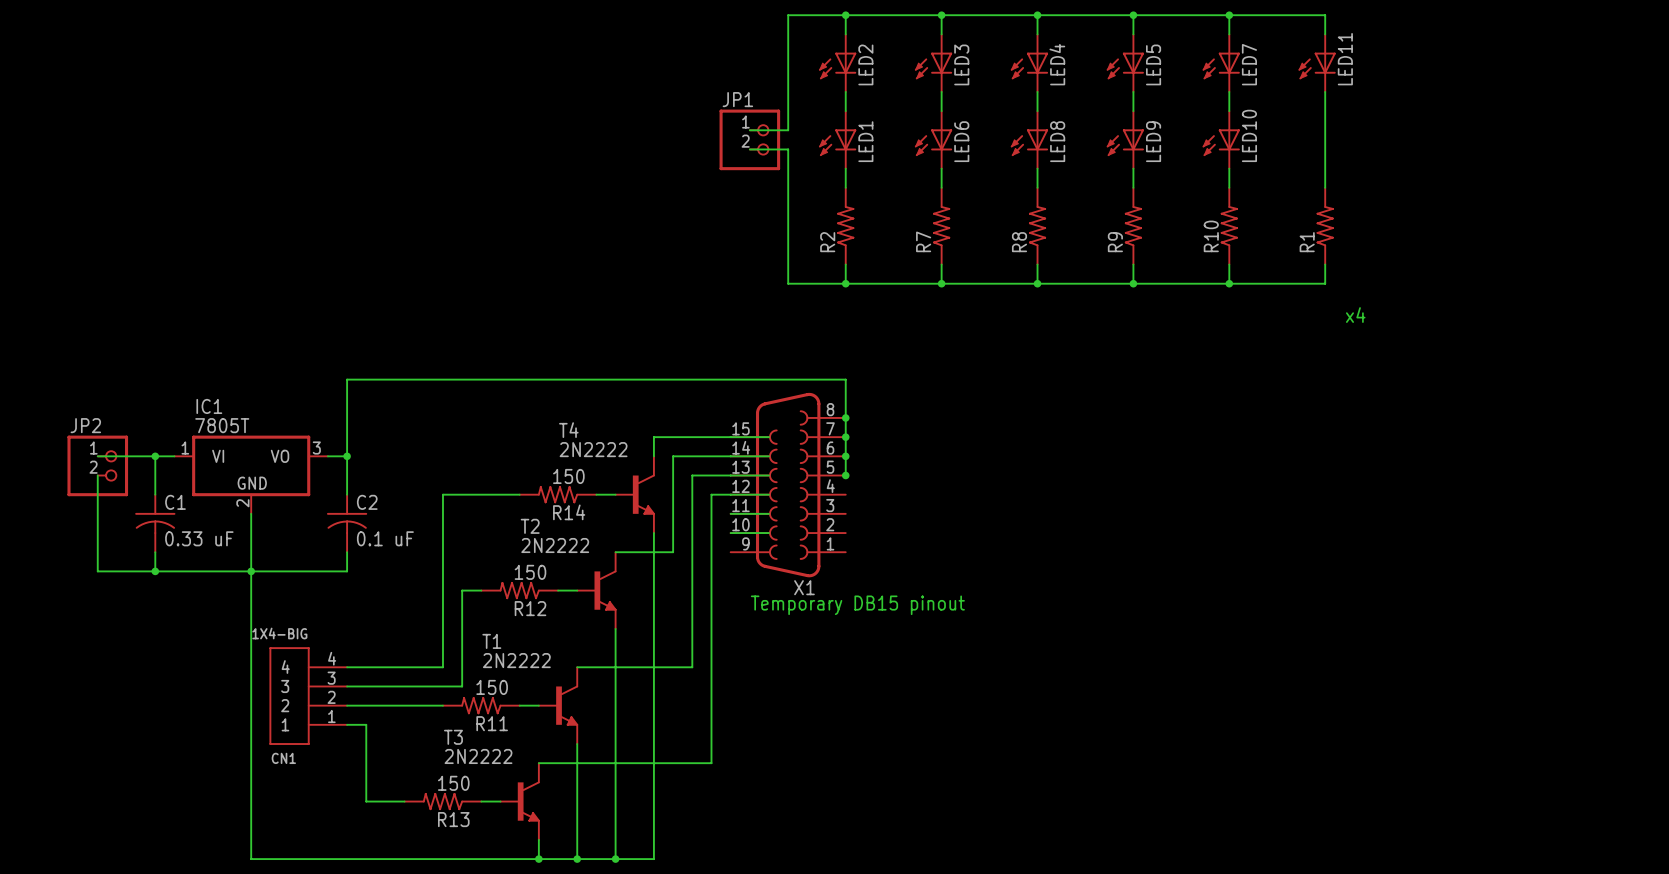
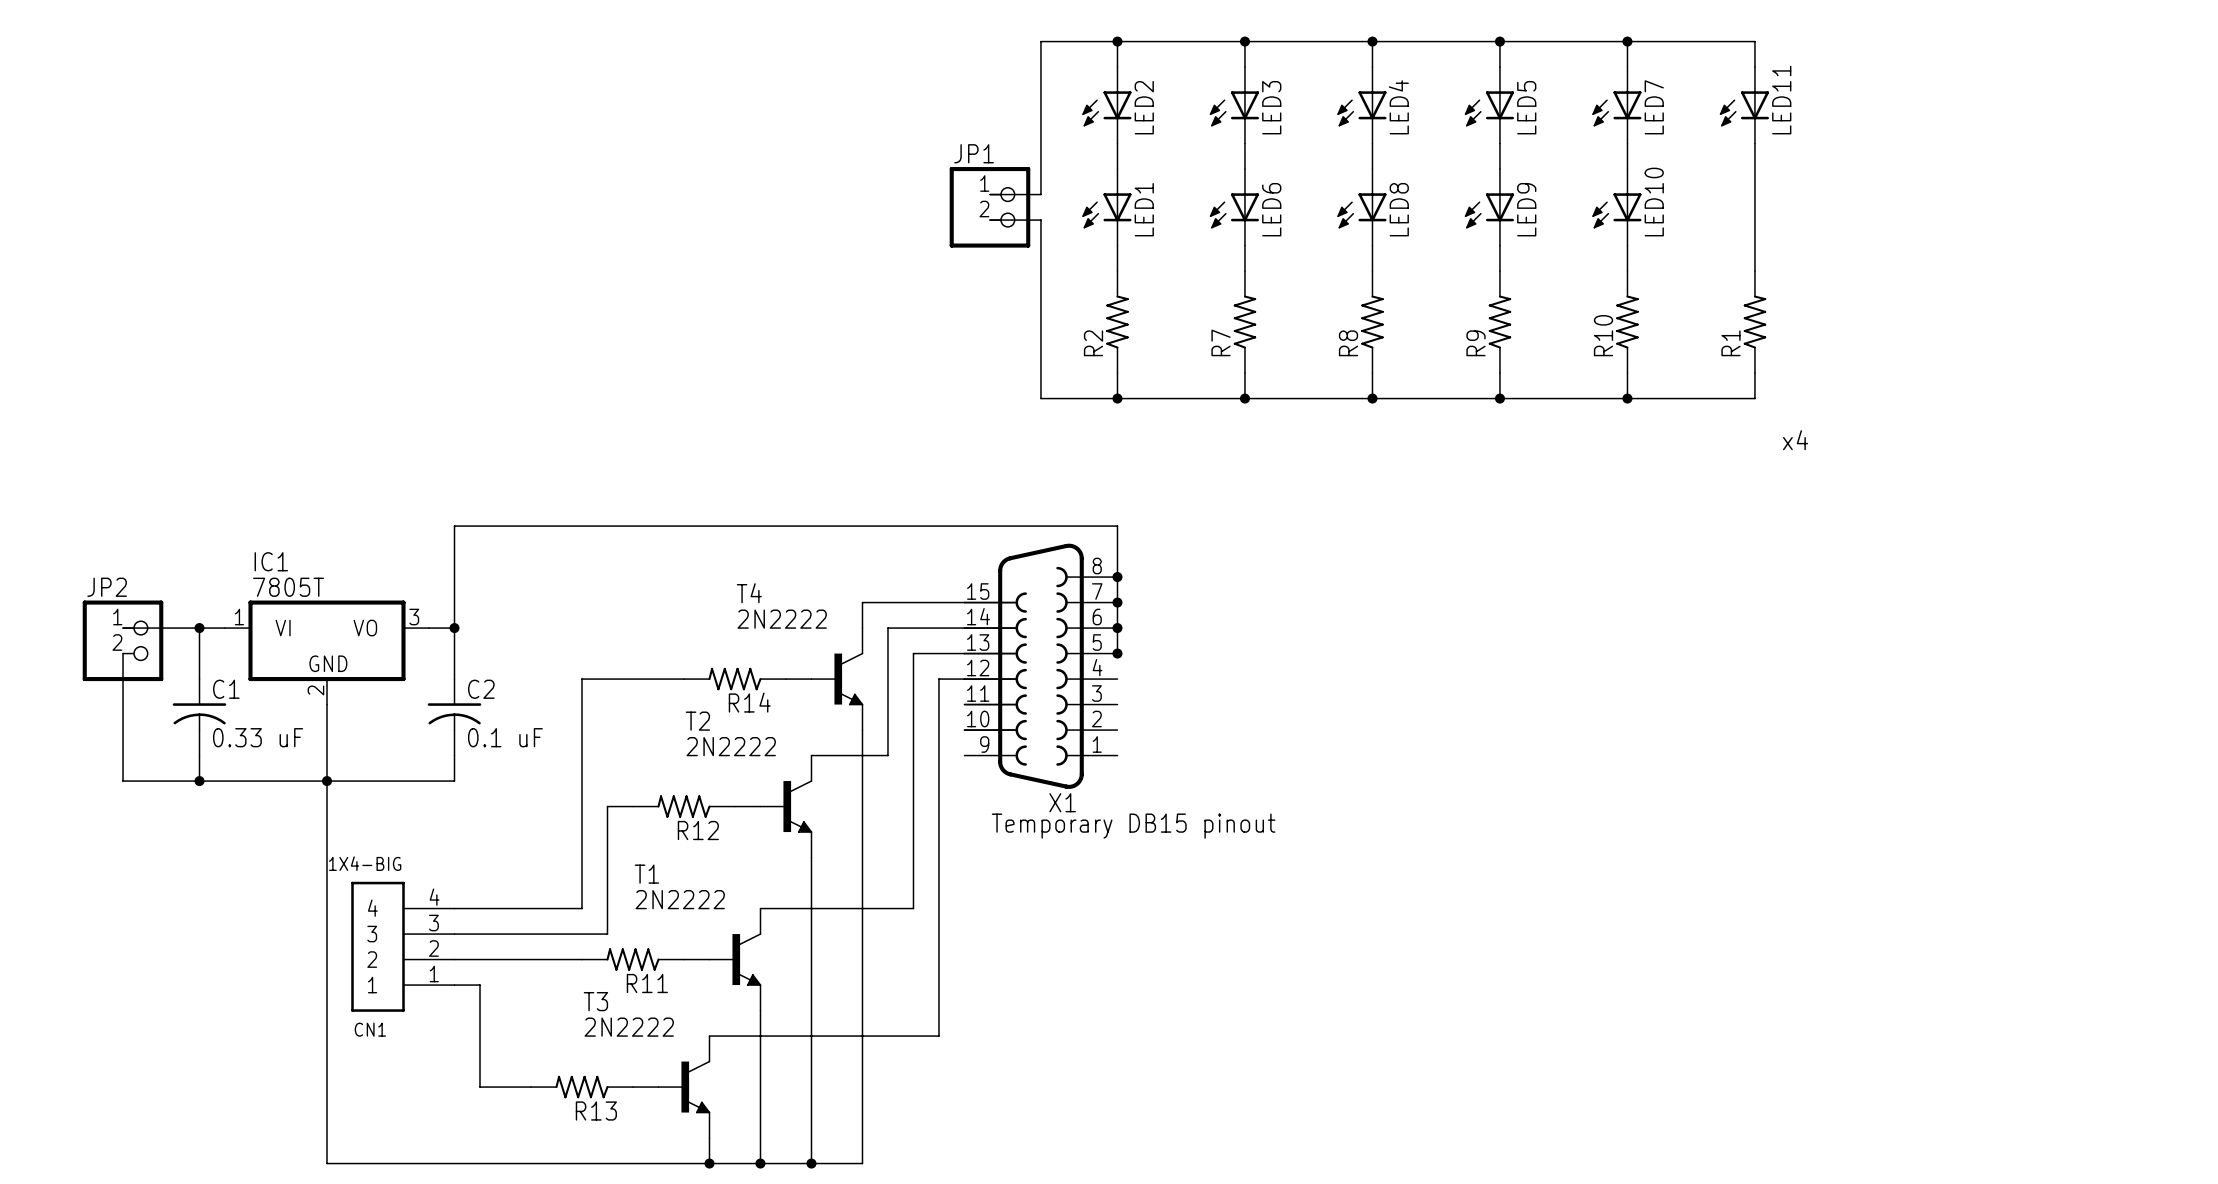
R14 value: 150 (568, 476) -> none
R12 value: 150 (530, 572) -> none
R11 value: 150 (492, 687) -> none
R13 value: 150 (453, 783) -> none

